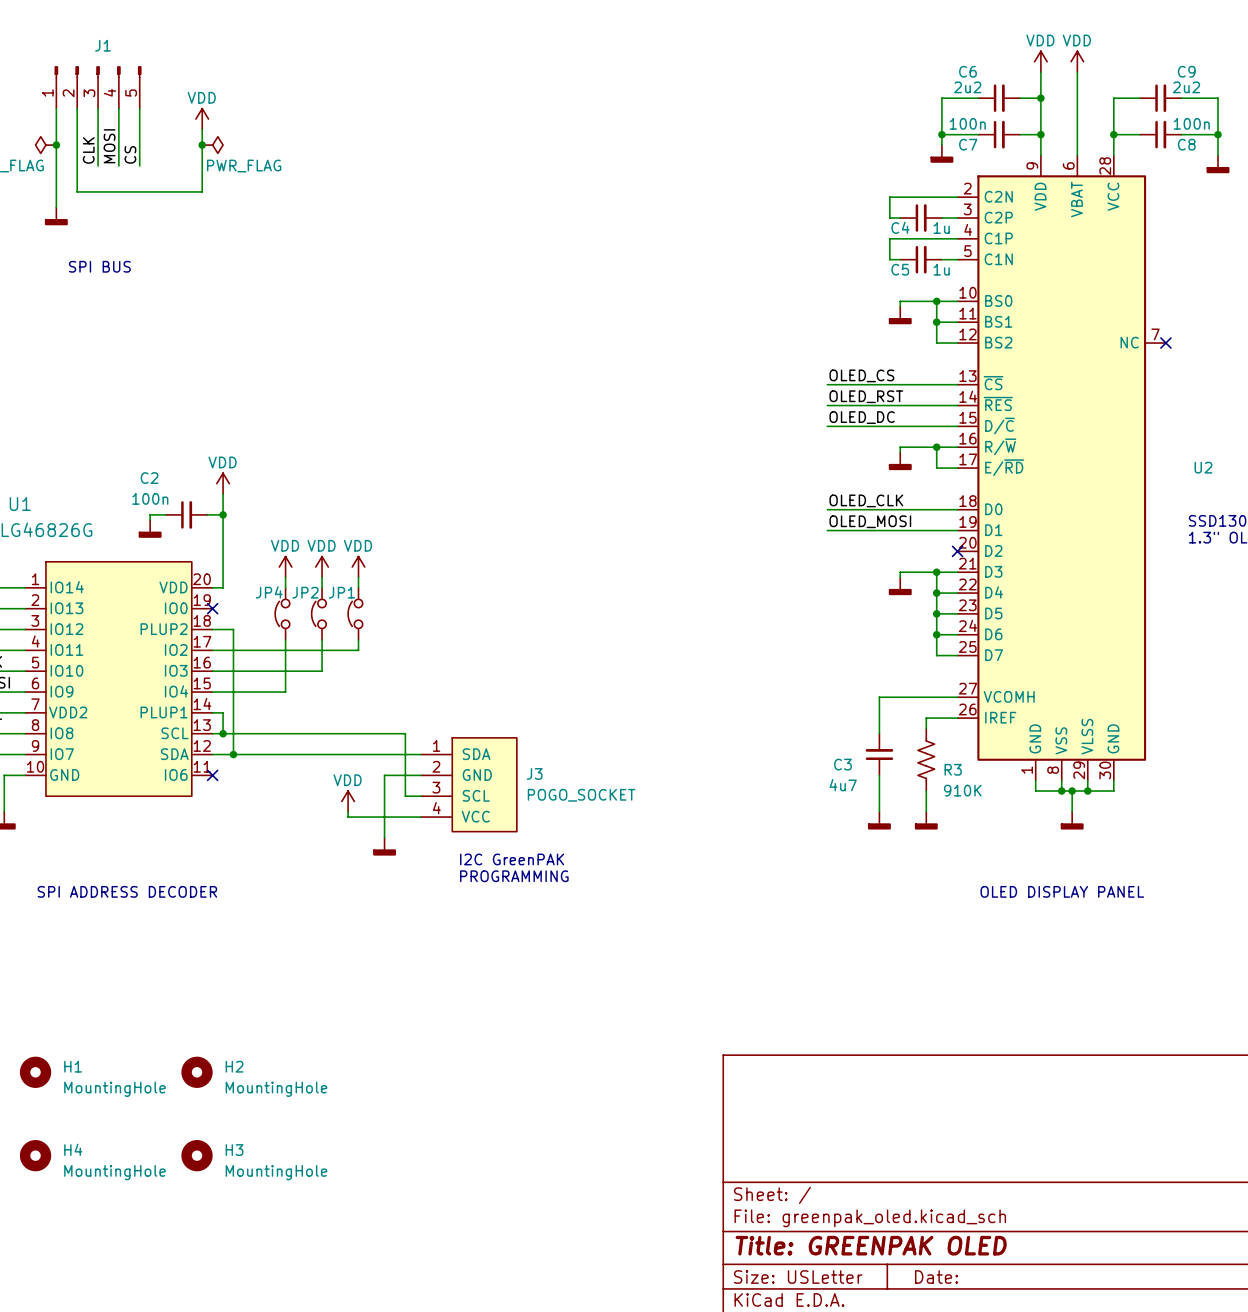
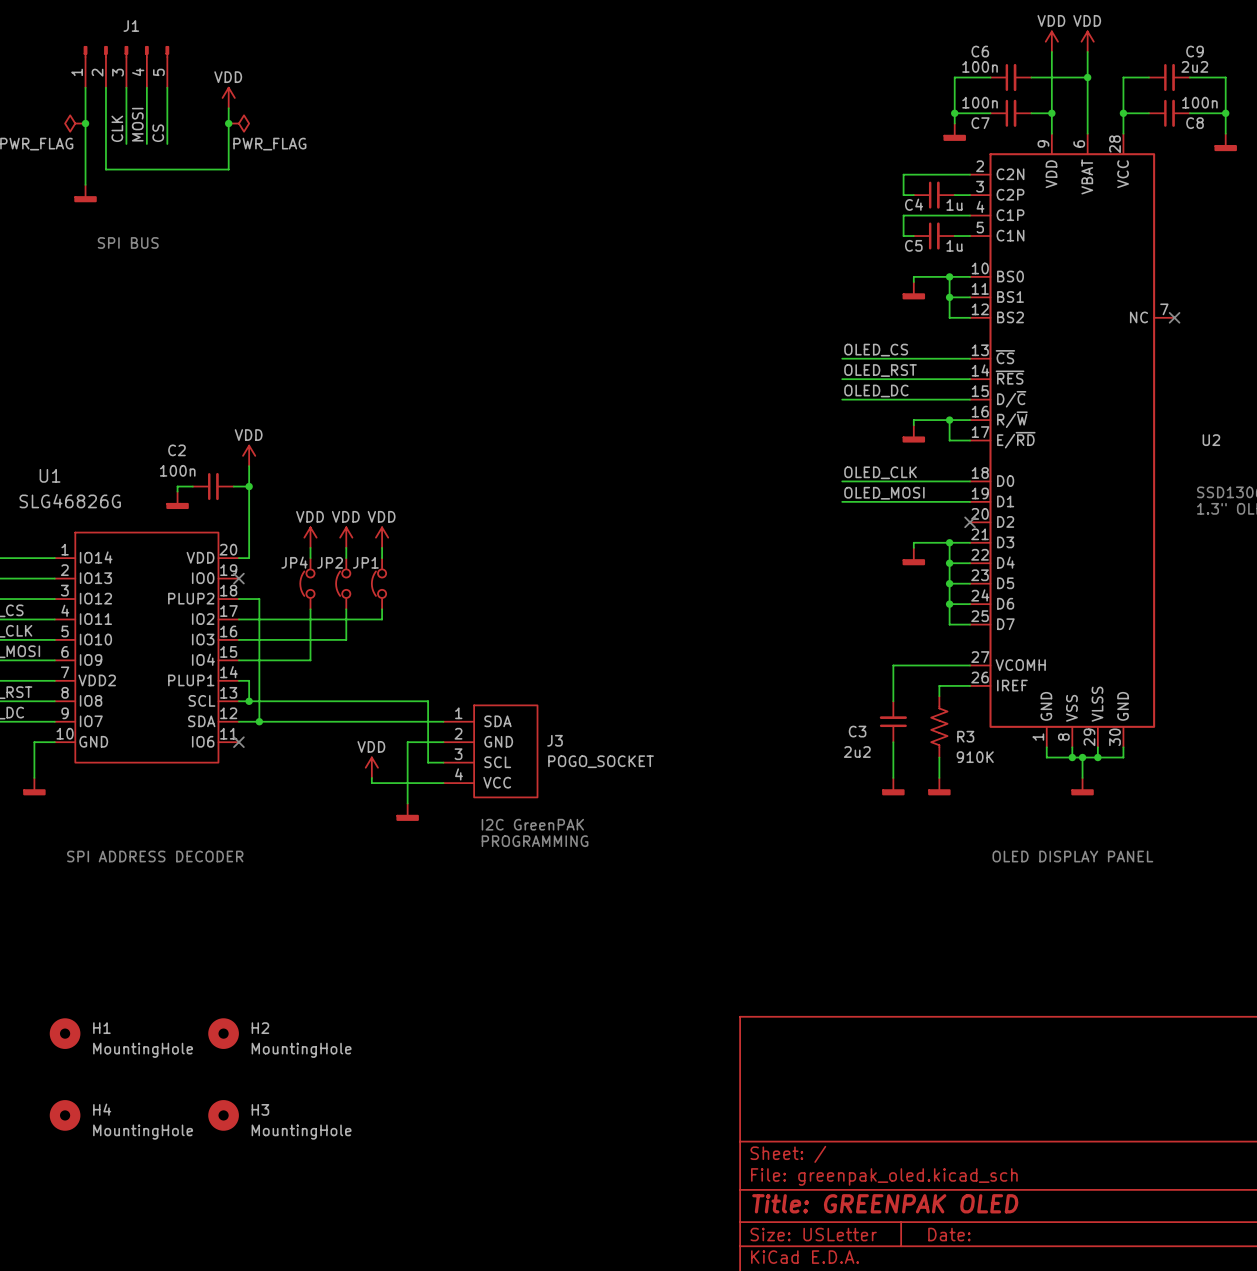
C6 value: 2u2 (967, 87) -> 100n (980, 66)
wire: none -> (1051, 77) (1087, 77)
junction position: (1040, 98) -> (1087, 77)
C3 value: 4u7 (843, 785) -> 2u2 (857, 752)

